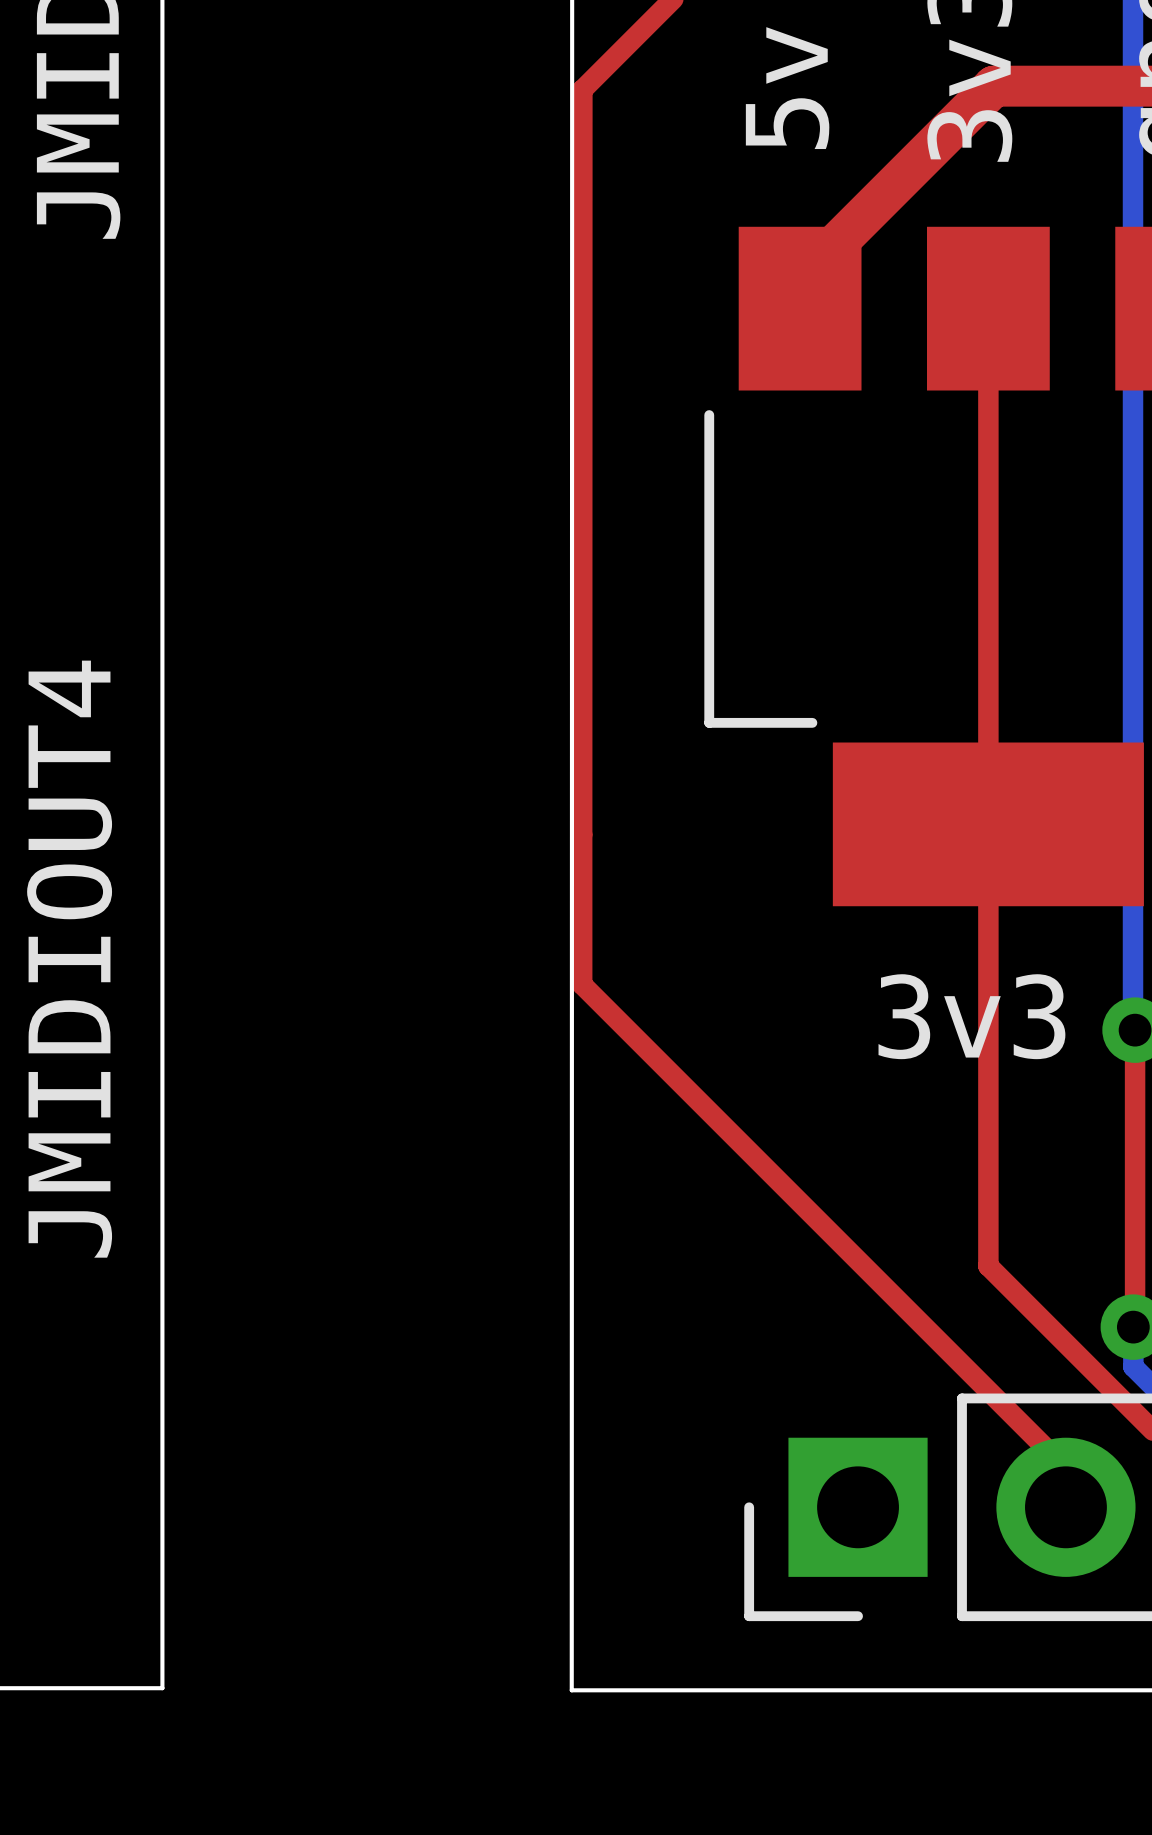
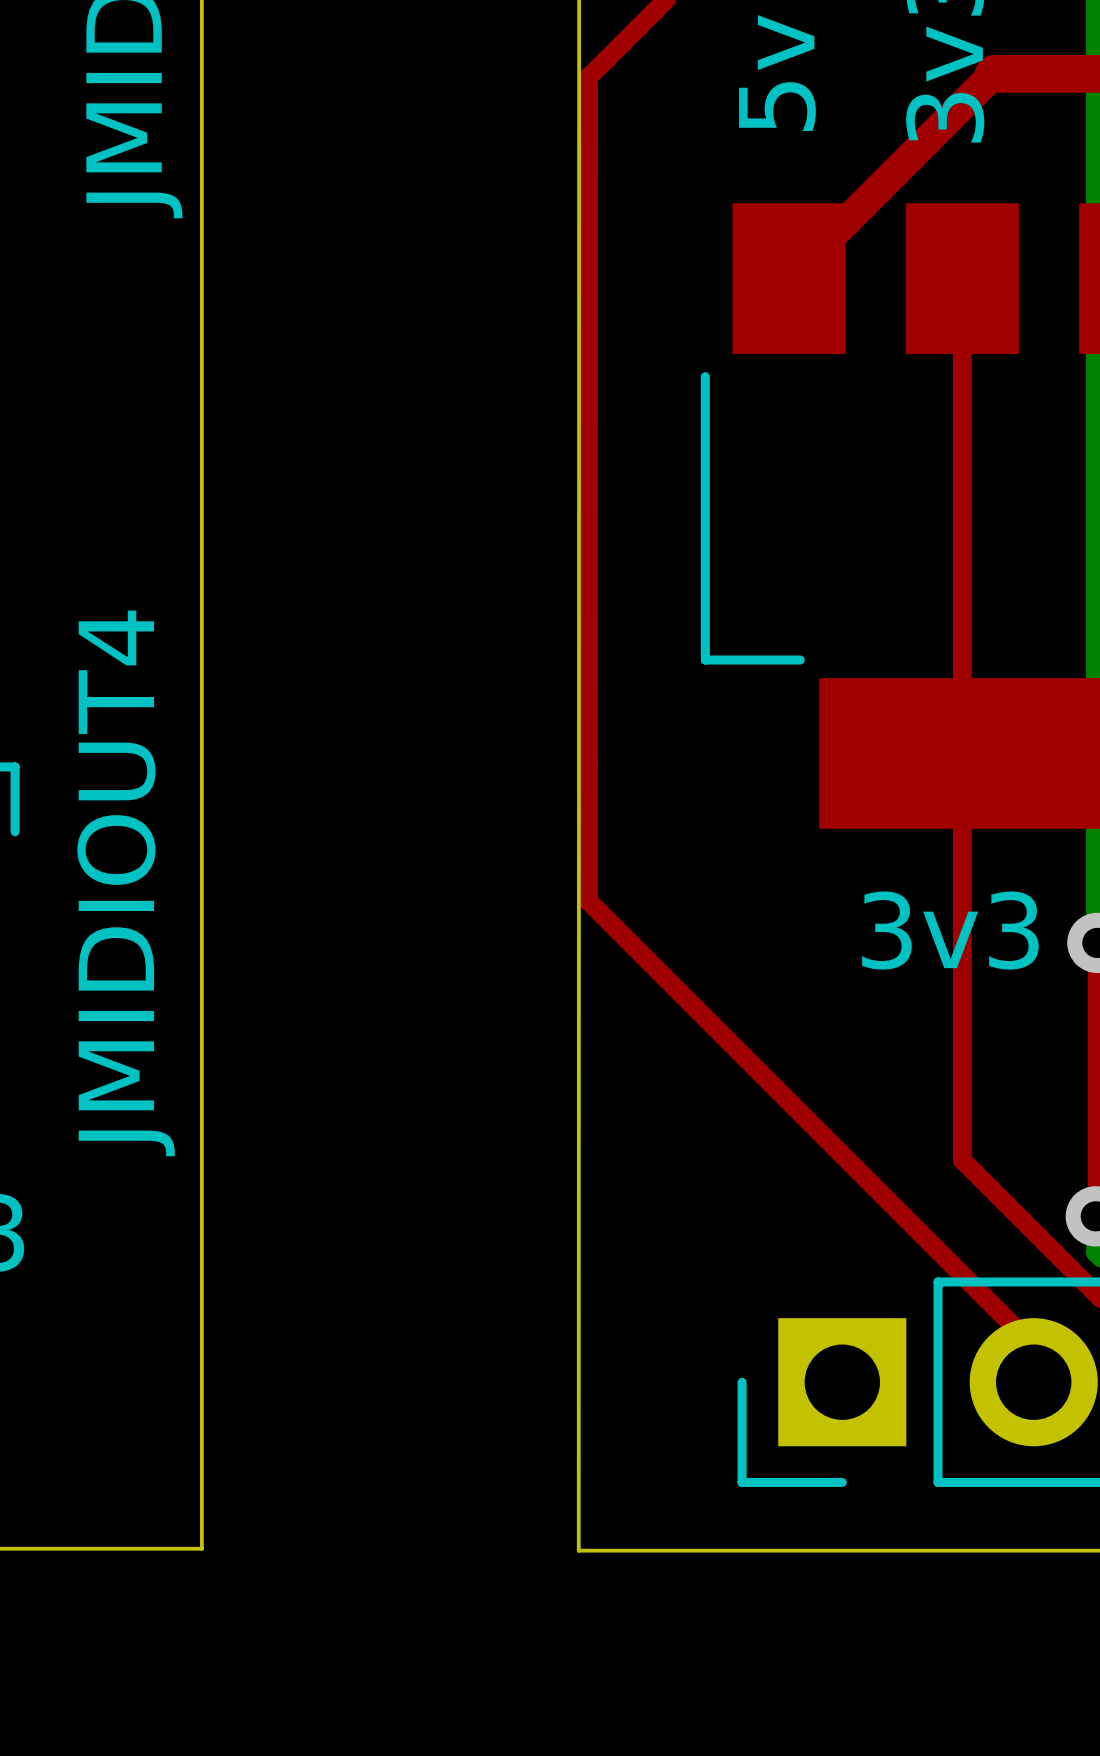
top track: (1022, 86) (993, 86) (800, 279) (800, 308) -> (993, 73) (788, 278)

